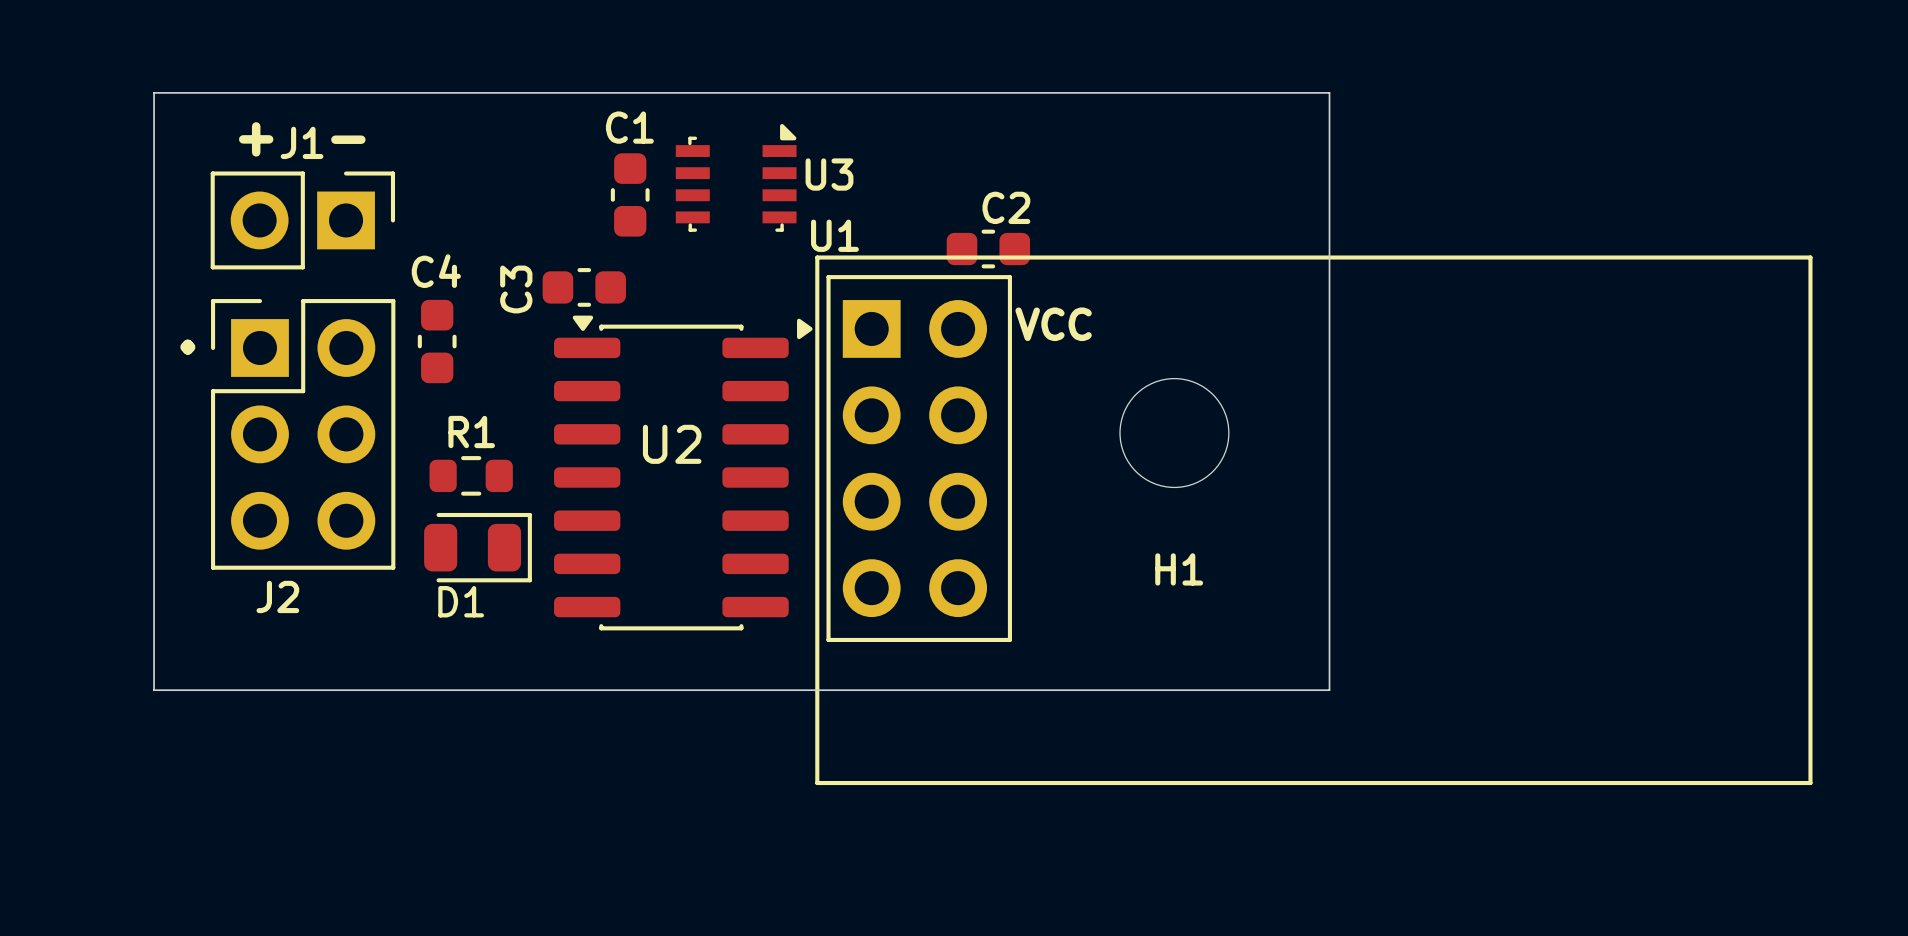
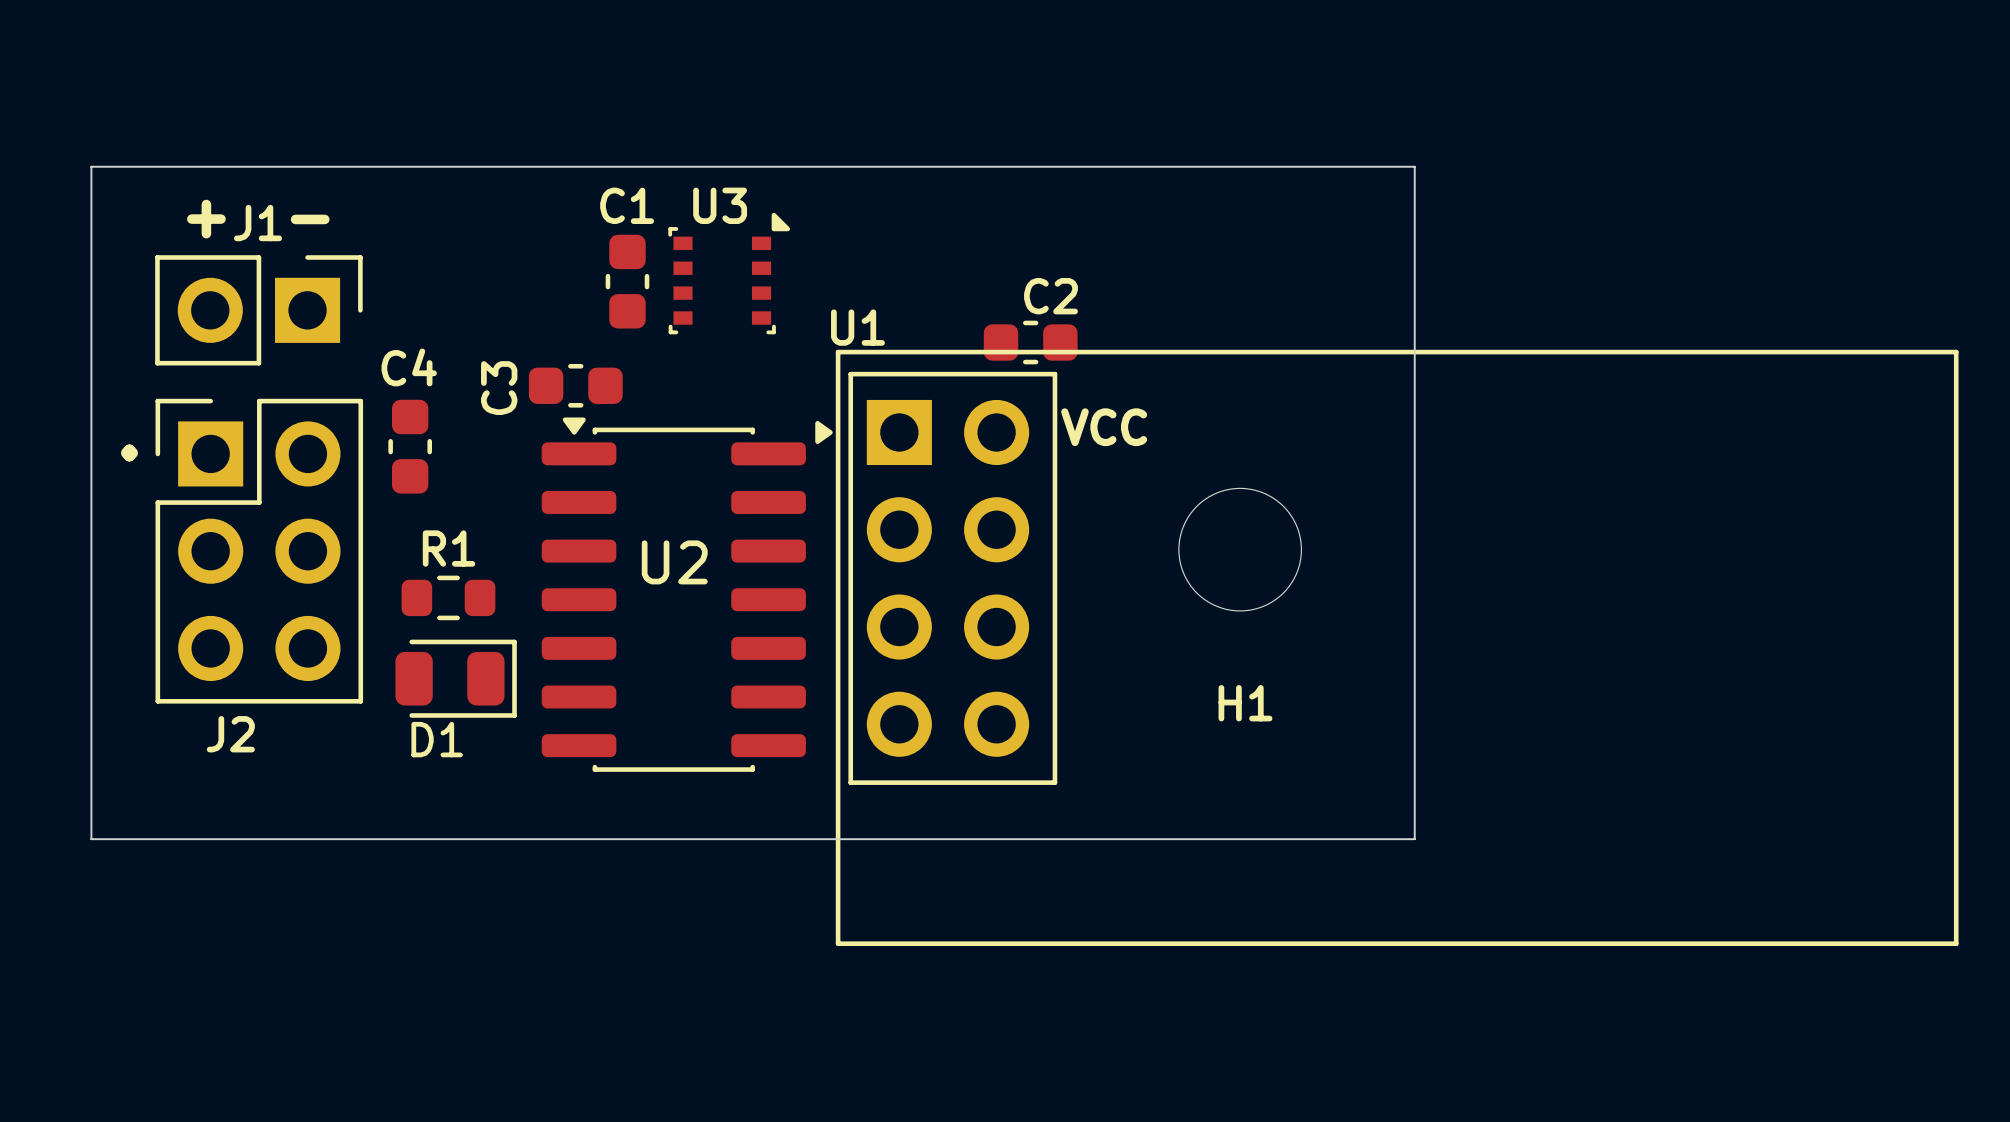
U3 footprint: [675, 124, 797, 232] -> [668, 212, 791, 335]
U3 name position: U3 (829, 174) -> U3 (720, 205)

